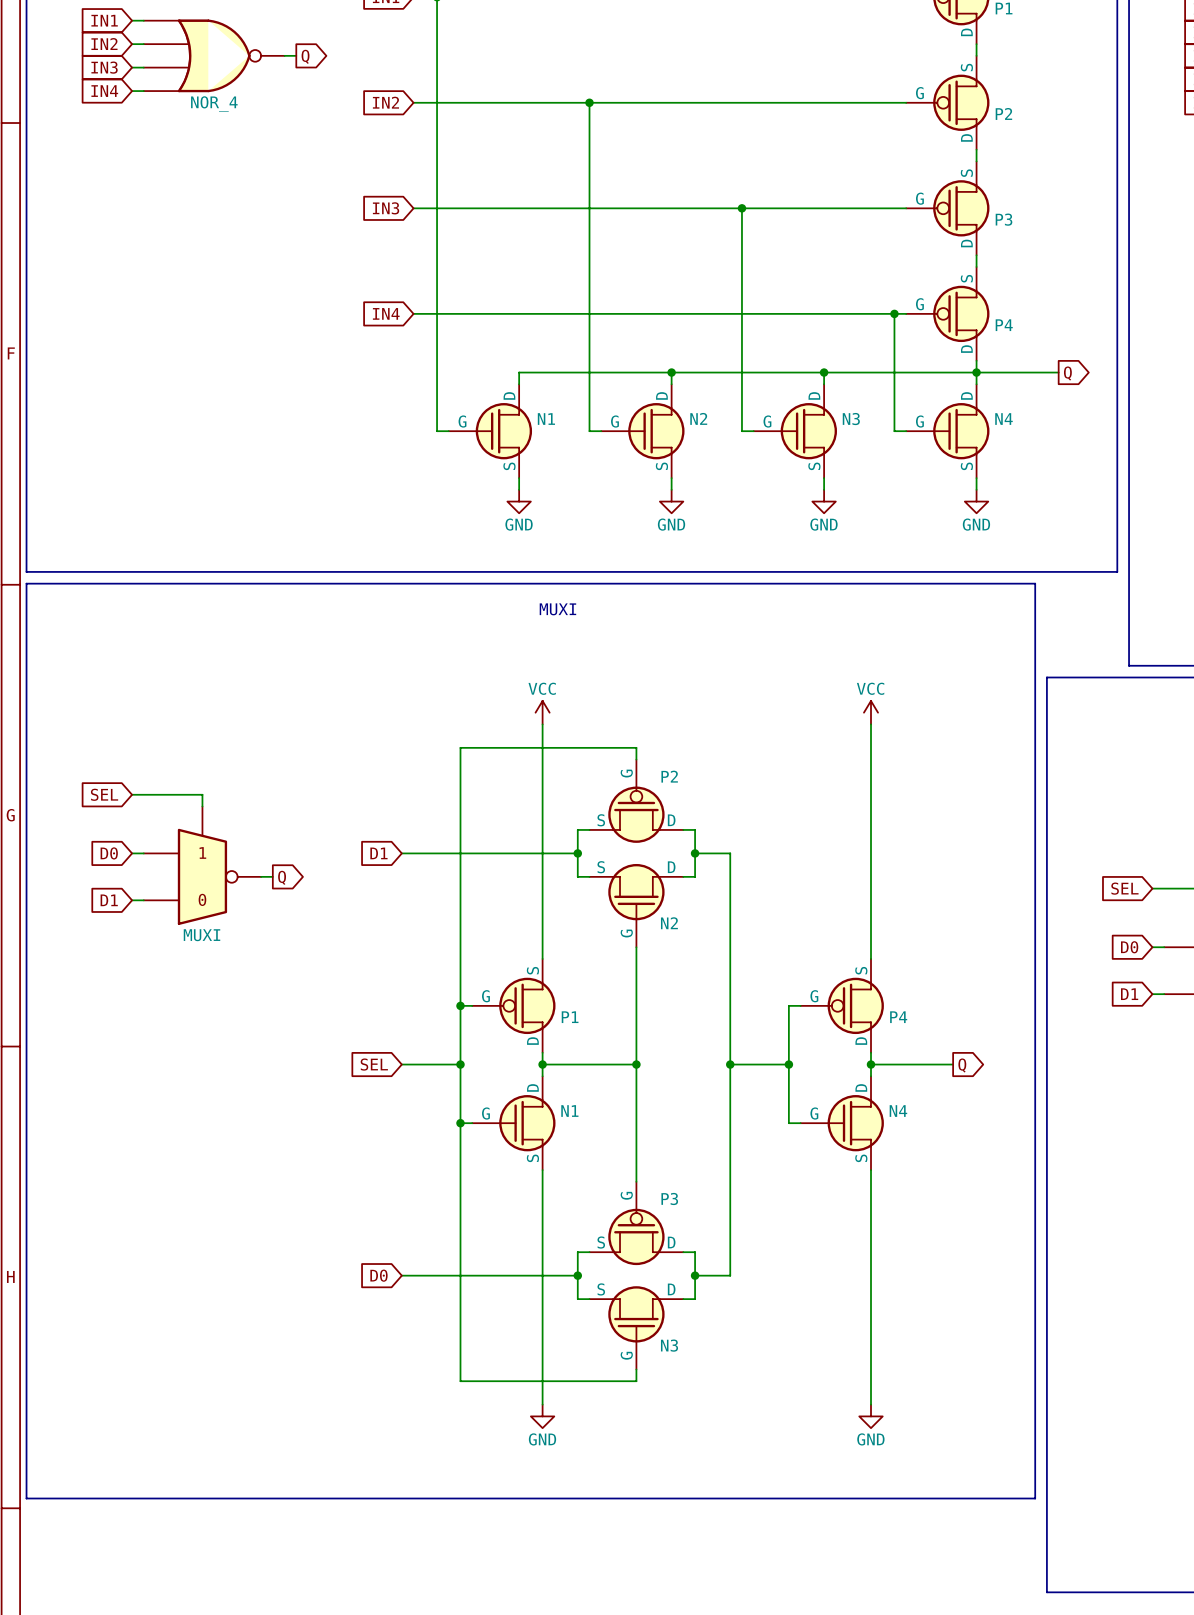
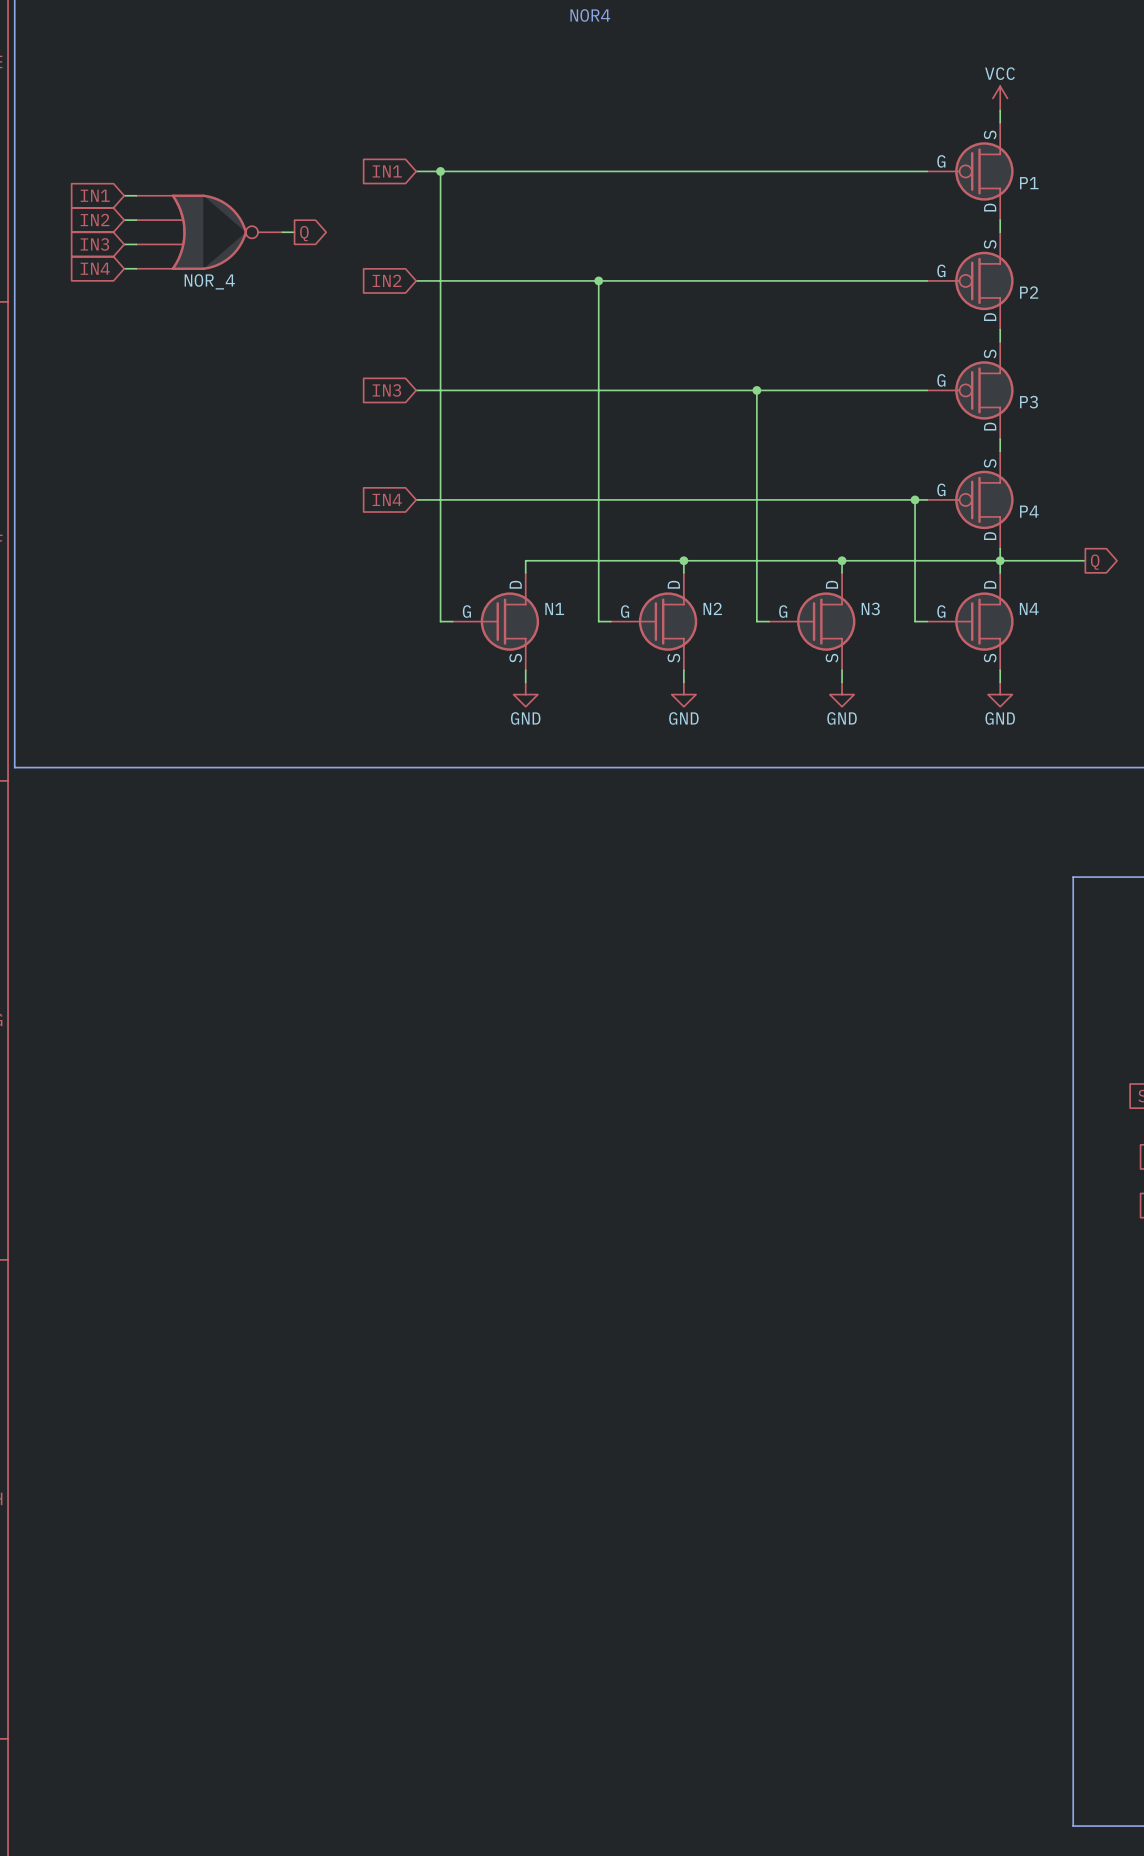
line: (26, 583) (1035, 583) (1035, 1498) (26, 1498) (26, 583) -> none
text: MUXI (557, 609) -> none
power symbol: VCC (542, 712) -> none
power symbol: VCC (871, 712) -> none
wire: (542, 724) (542, 958) -> none
wire: (871, 724) (871, 958) -> none
wire: (636, 759) (636, 747) (460, 747) (460, 1381) (636, 1381) (636, 1369) -> none
global label: SEL (104, 794) -> none
wire: (132, 794) (202, 794) (202, 806) -> none
P2: (636, 801) -> none
wire: (589, 829) (577, 829) (577, 876) (589, 876) -> none
wire: (683, 829) (695, 829) (695, 876) (683, 876) -> none
global label: D0 (109, 853) -> none
wire: (132, 853) (143, 853) -> none
global label: D1 (378, 853) -> none
wire: (401, 853) (577, 853) -> none
junction: (577, 853) -> none
wire: (695, 853) (730, 853) (730, 1275) (695, 1275) -> none
junction: (695, 853) -> none
part: MUXI (202, 865) -> none
wire: (261, 876) (272, 876) -> none
global label: Q (282, 877) -> none
global label: D1 (109, 900) -> none
wire: (132, 900) (143, 900) -> none
N2: (636, 905) -> none
wire: (636, 947) (636, 1181) -> none
wire: (460, 1005) (472, 1005) -> none
junction: (460, 1005) -> none
P1: (513, 1005) -> none
wire: (800, 1005) (788, 1005) (788, 1123) (800, 1123) -> none
P4: (842, 1005) -> none
wire: (542, 1052) (542, 1076) -> none
wire: (871, 1052) (871, 1076) -> none
global label: SEL (374, 1064) -> none
wire: (401, 1064) (460, 1064) -> none
junction: (460, 1064) -> none
wire: (542, 1064) (636, 1064) -> none
junction: (542, 1064) -> none
junction: (636, 1064) -> none
wire: (730, 1064) (788, 1064) -> none
junction: (730, 1064) -> none
junction: (788, 1064) -> none
wire: (871, 1064) (953, 1064) -> none
junction: (871, 1064) -> none
global label: Q (962, 1065) -> none
wire: (460, 1123) (472, 1123) -> none
junction: (460, 1123) -> none
N1: (513, 1123) -> none
N4: (842, 1123) -> none
wire: (542, 1170) (542, 1404) -> none
wire: (871, 1170) (871, 1404) -> none
P3: (636, 1223) -> none
wire: (589, 1252) (577, 1252) (577, 1299) (589, 1299) -> none
wire: (683, 1252) (695, 1252) (695, 1299) (683, 1299) -> none
global label: D0 (378, 1275) -> none
wire: (401, 1275) (577, 1275) -> none
junction: (577, 1275) -> none
junction: (695, 1275) -> none
N3: (636, 1327) -> none
power symbol: GND (542, 1416) -> none
power symbol: GND (871, 1416) -> none

